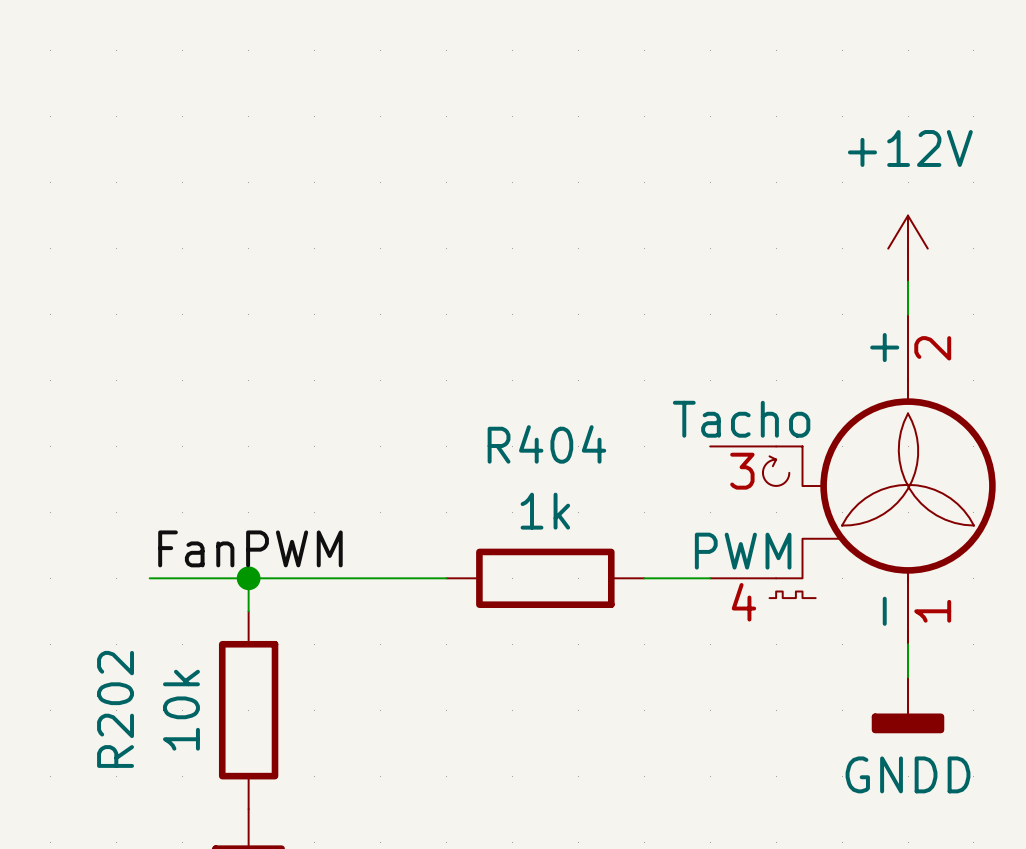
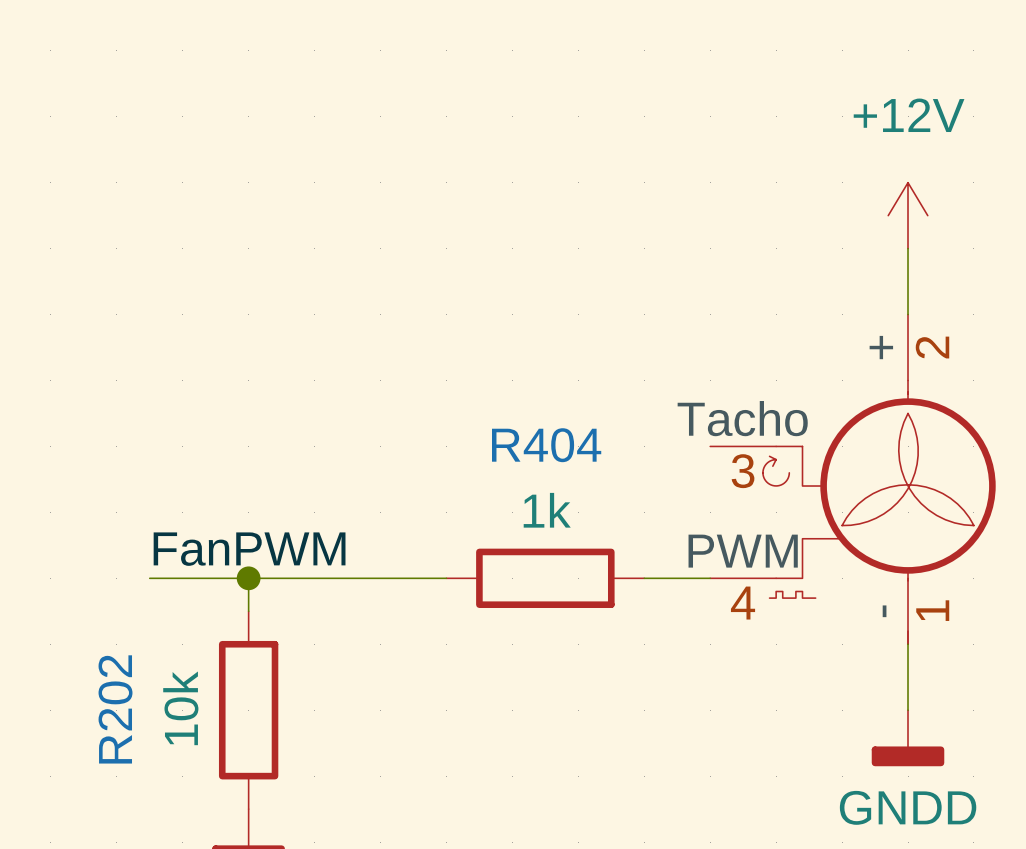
power symbol position: +12V (908, 248) -> +12V (908, 215)
power symbol position: GNDD (908, 705) -> GNDD (908, 738)

